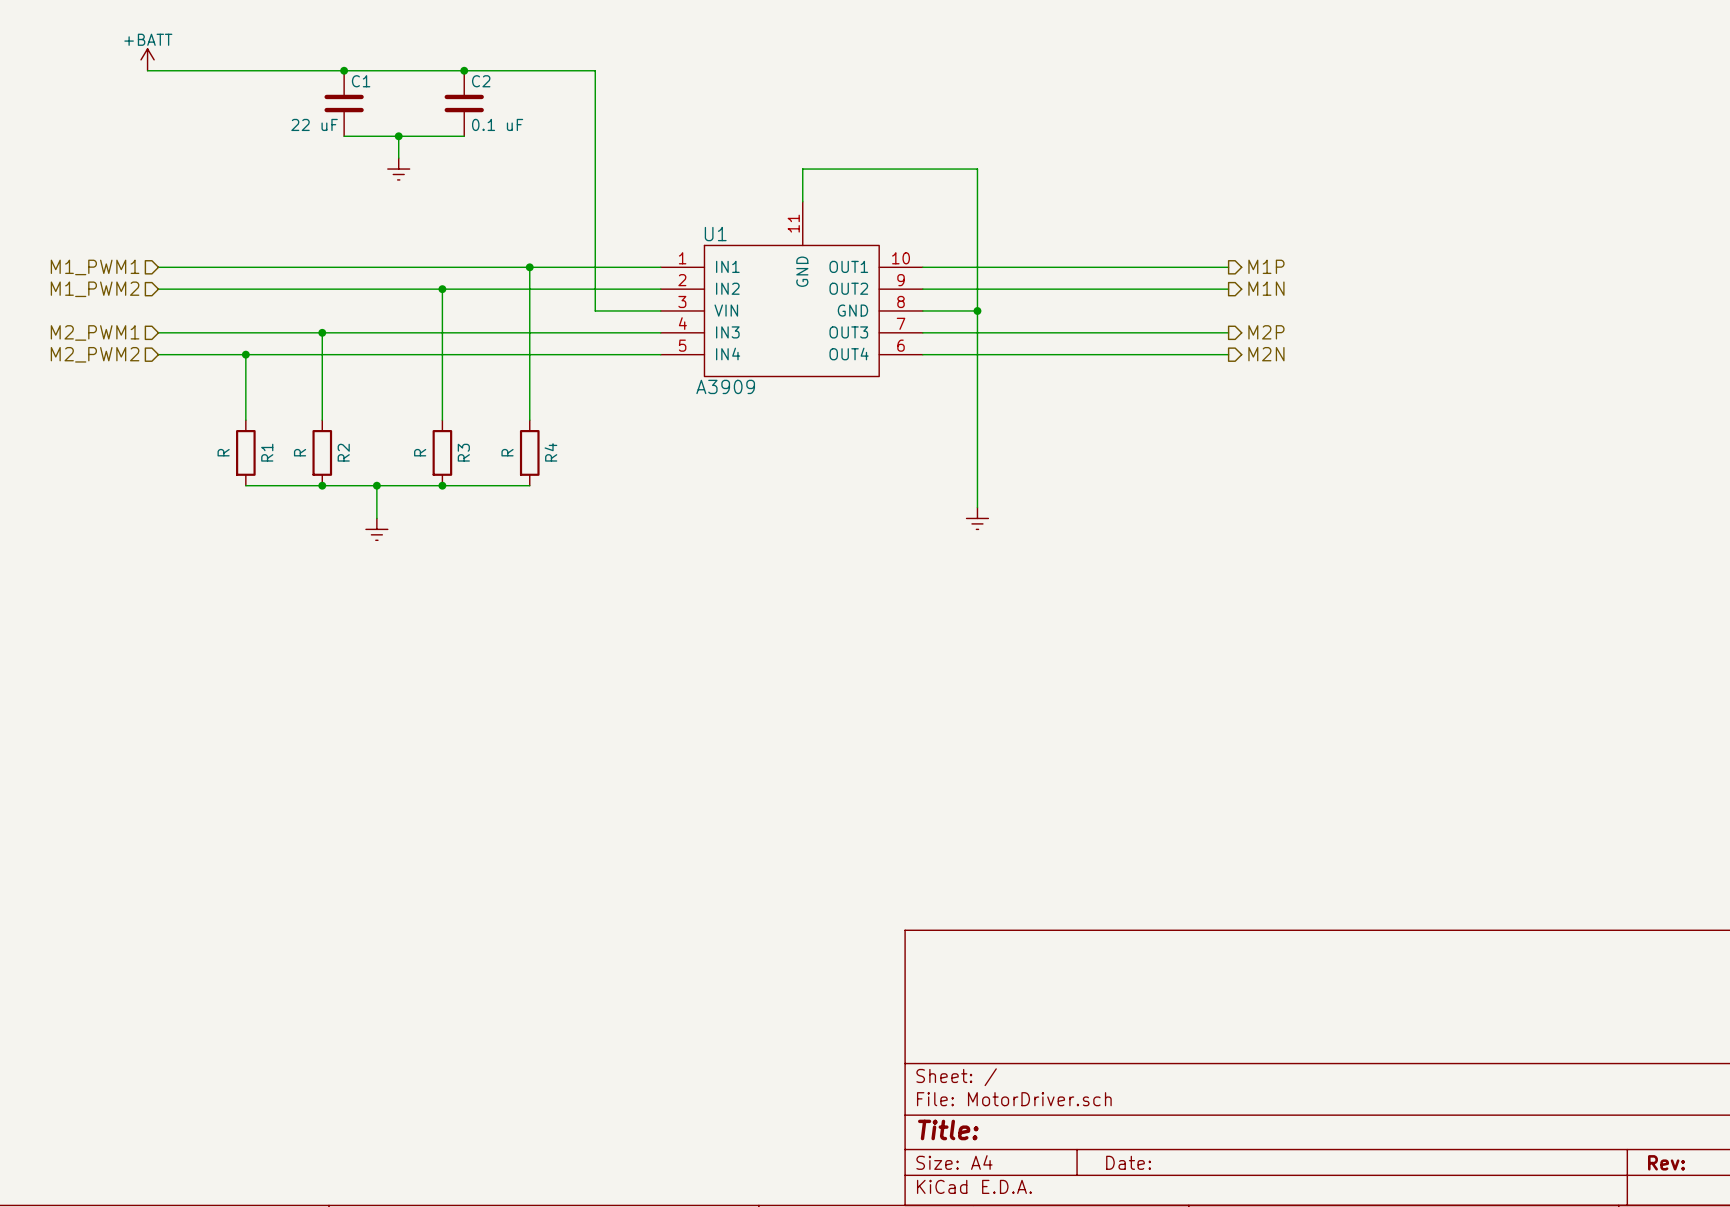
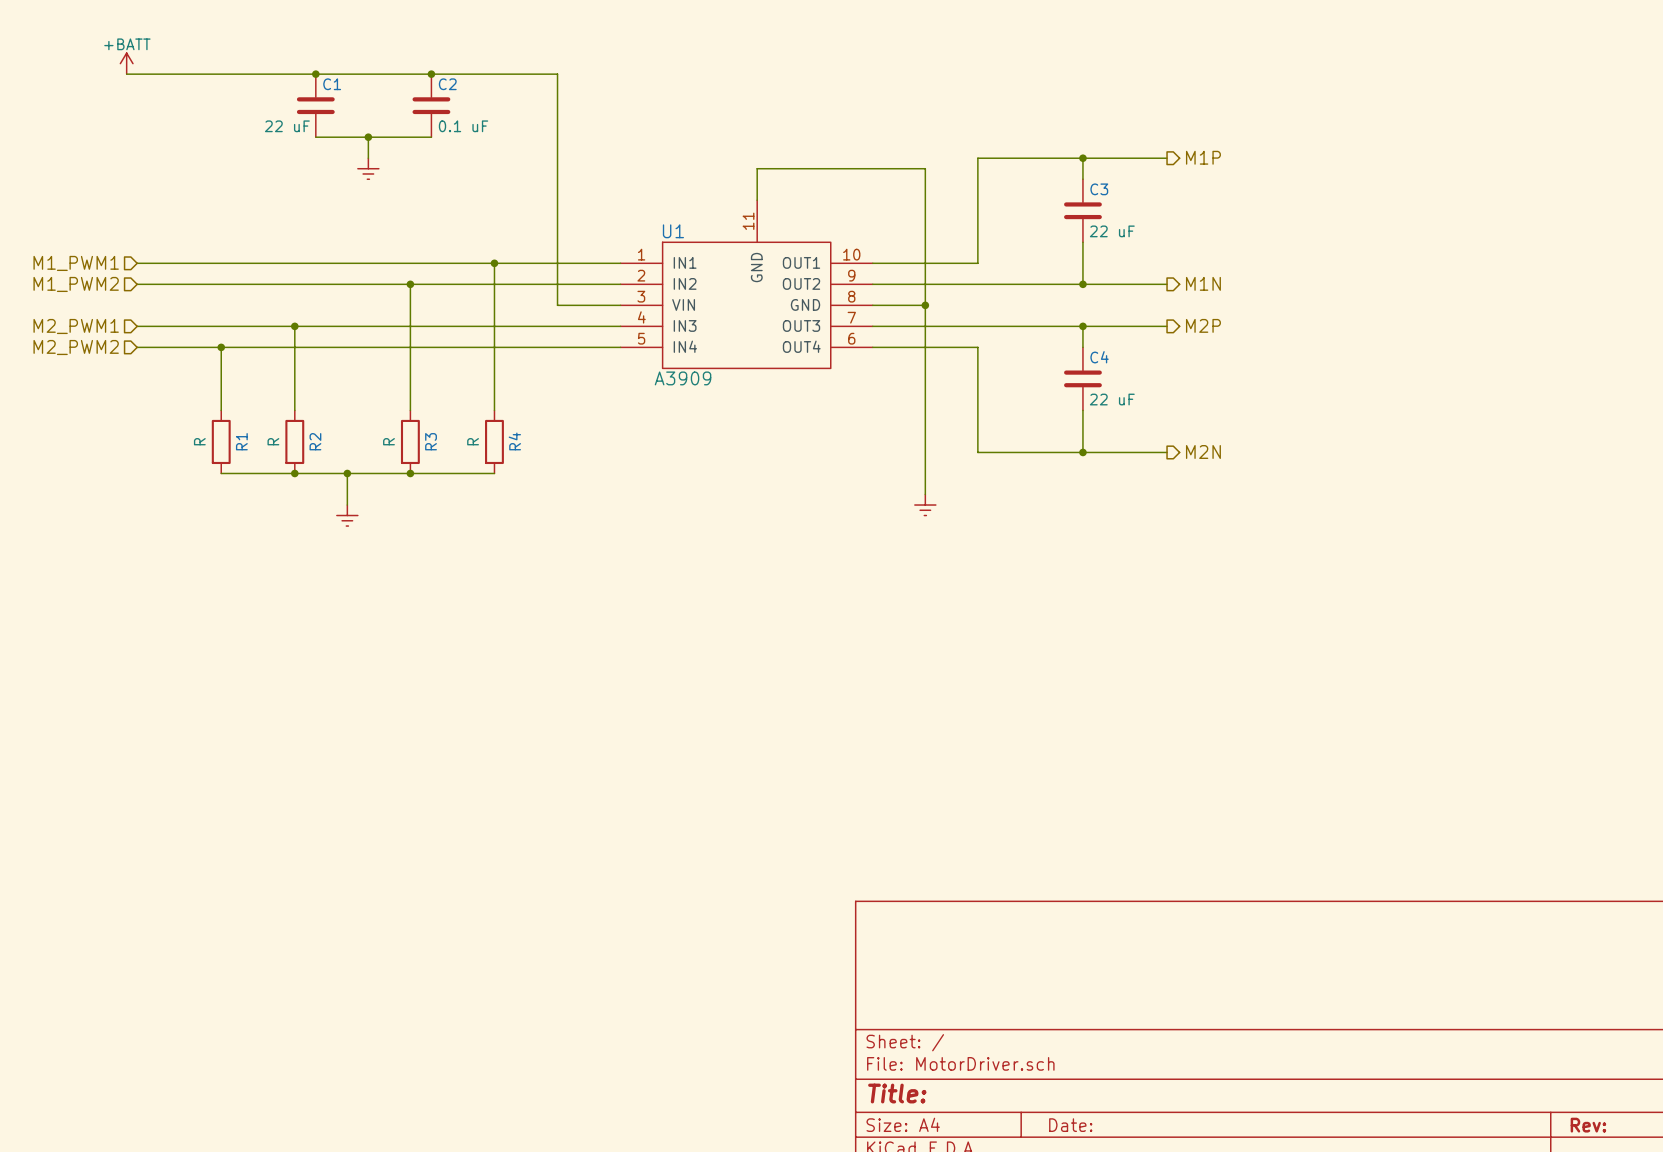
wire: none -> (1082, 158) (1082, 179)
junction: none -> (1082, 158)
C3: none -> 22 uF (1082, 210)
wire: none -> (1082, 242) (1082, 284)
hierarchical label position: M1P (1266, 266) -> M1P (1203, 157)
wire: (1032, 267) (1228, 267) -> (977, 263) (977, 158) (1167, 158)
junction: none -> (1082, 284)
wire: none -> (1082, 326) (1082, 347)
junction: none -> (1082, 326)
wire: (1032, 354) (1228, 354) -> (977, 347) (977, 452) (1167, 452)
hierarchical label position: M2N (1266, 354) -> M2N (1203, 451)
C4: none -> 22 uF (1082, 378)
wire: none -> (1082, 410) (1082, 452)
junction: none -> (1082, 452)

